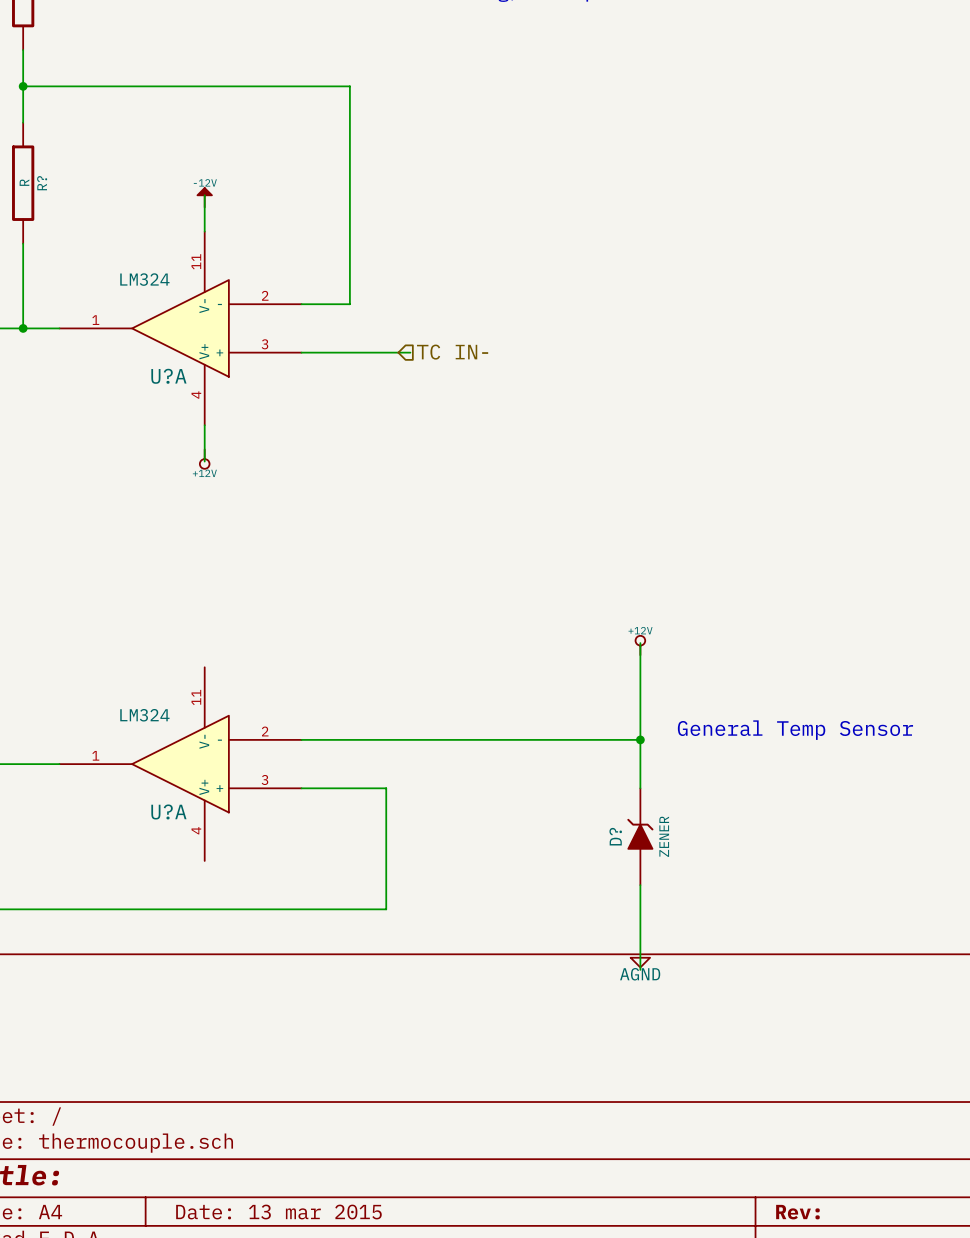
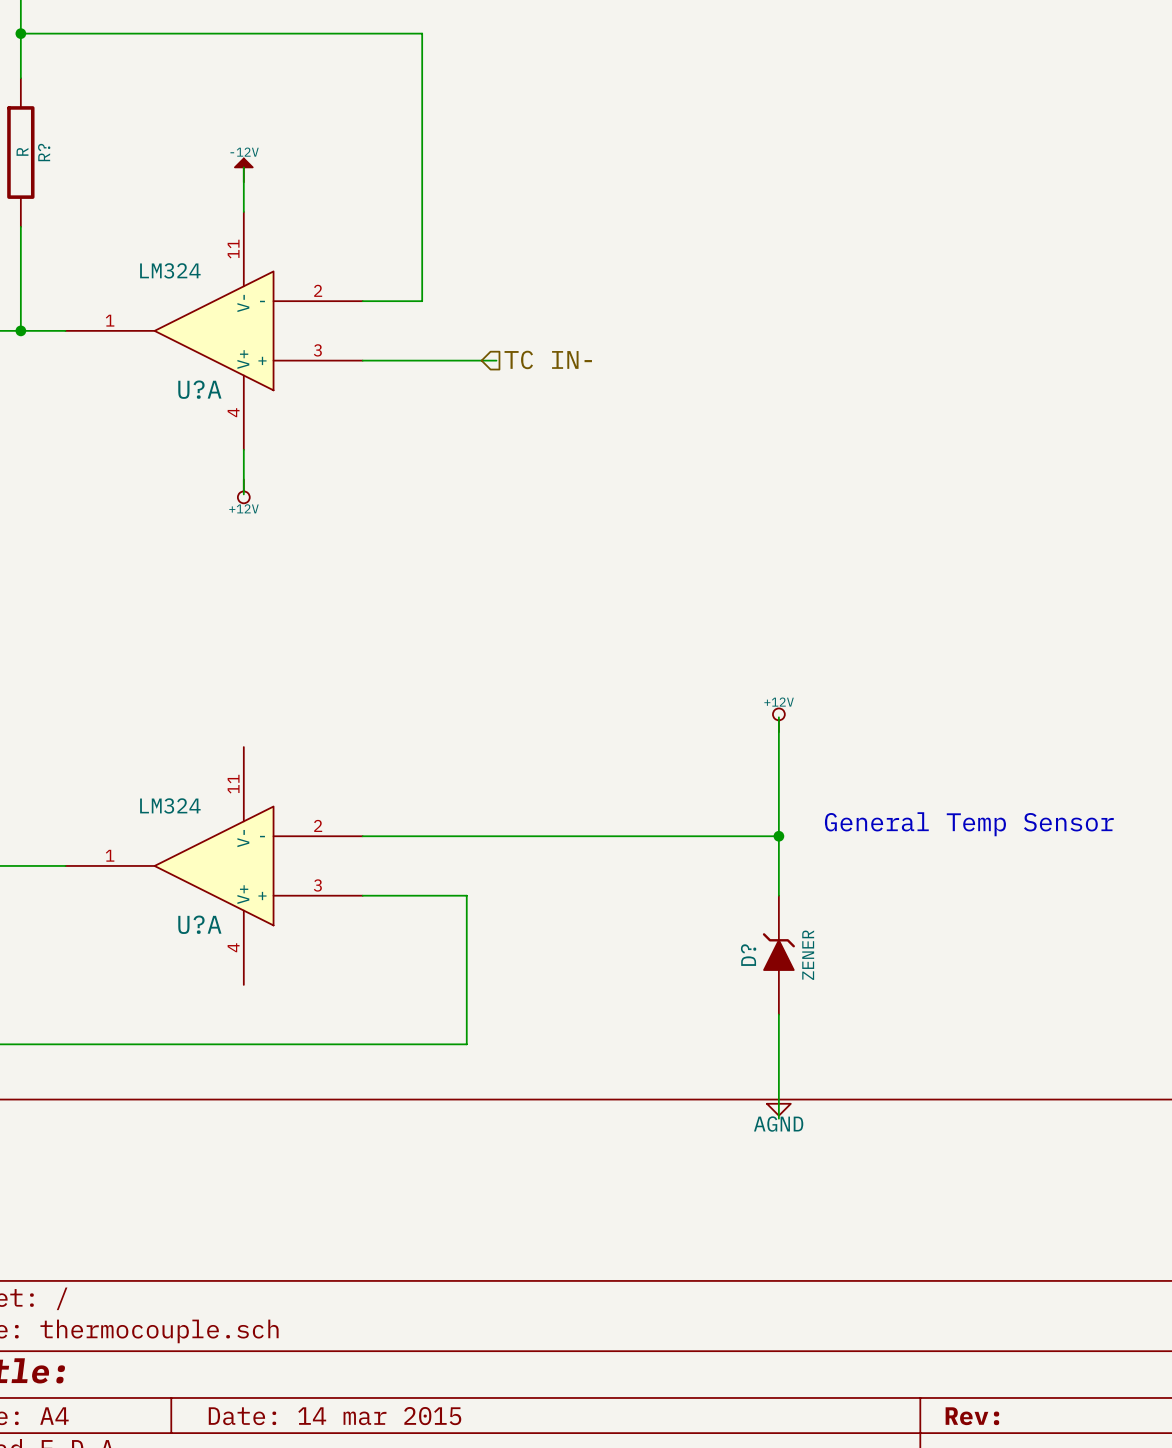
title block: Date: 13 mar 2015 (278, 1212) -> Date: 14 mar 2015 (335, 1416)

